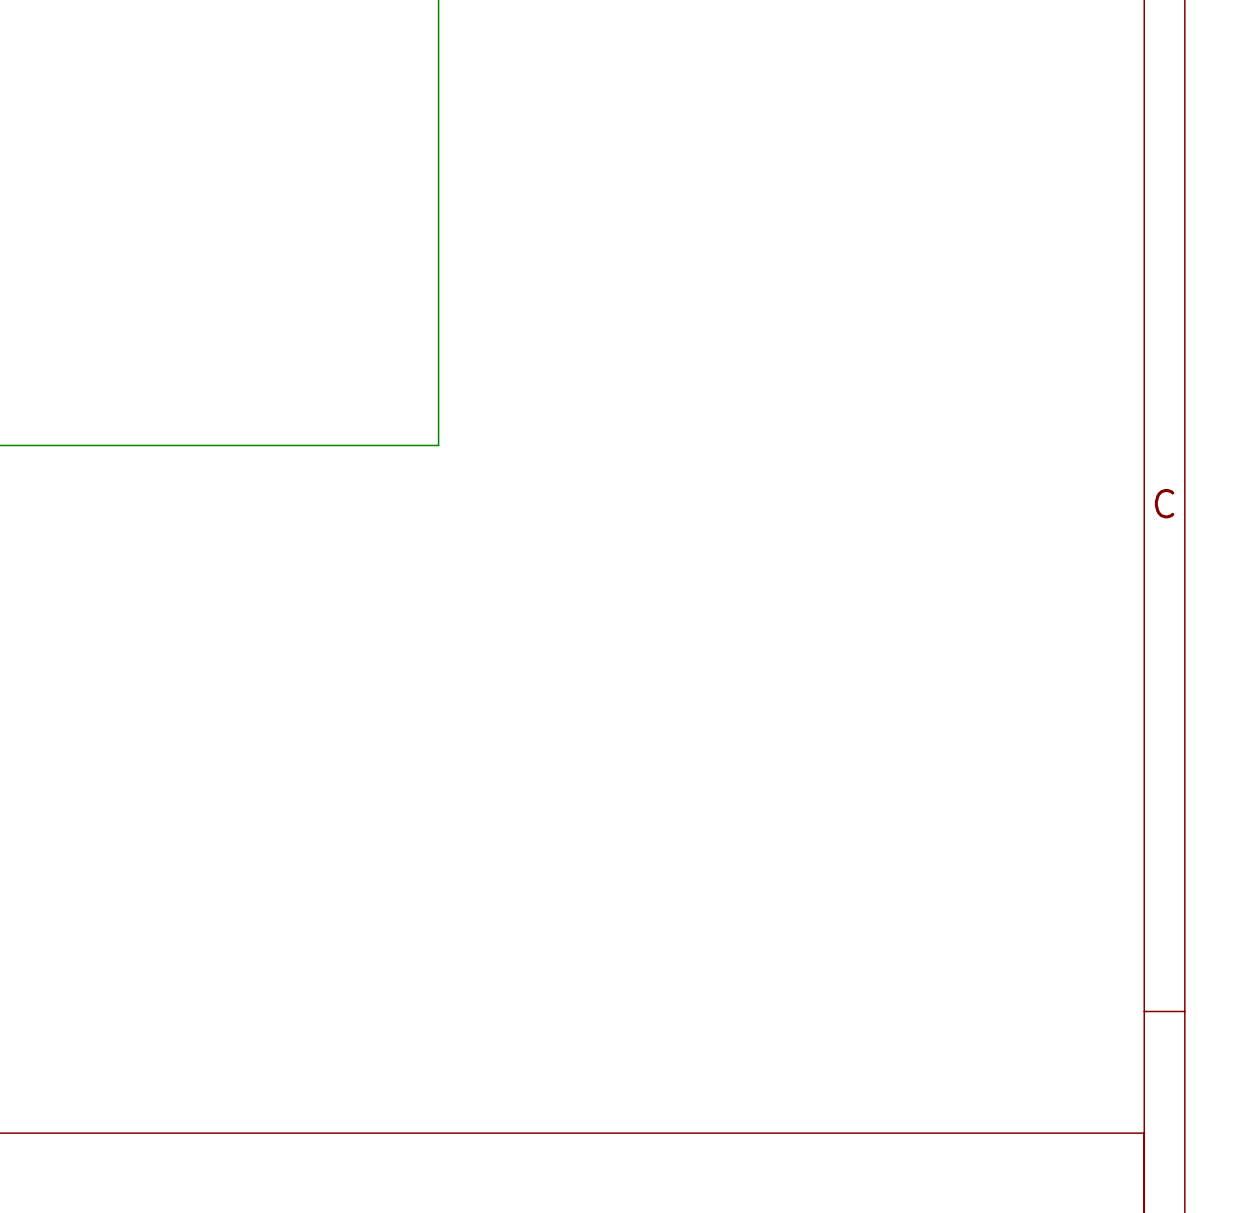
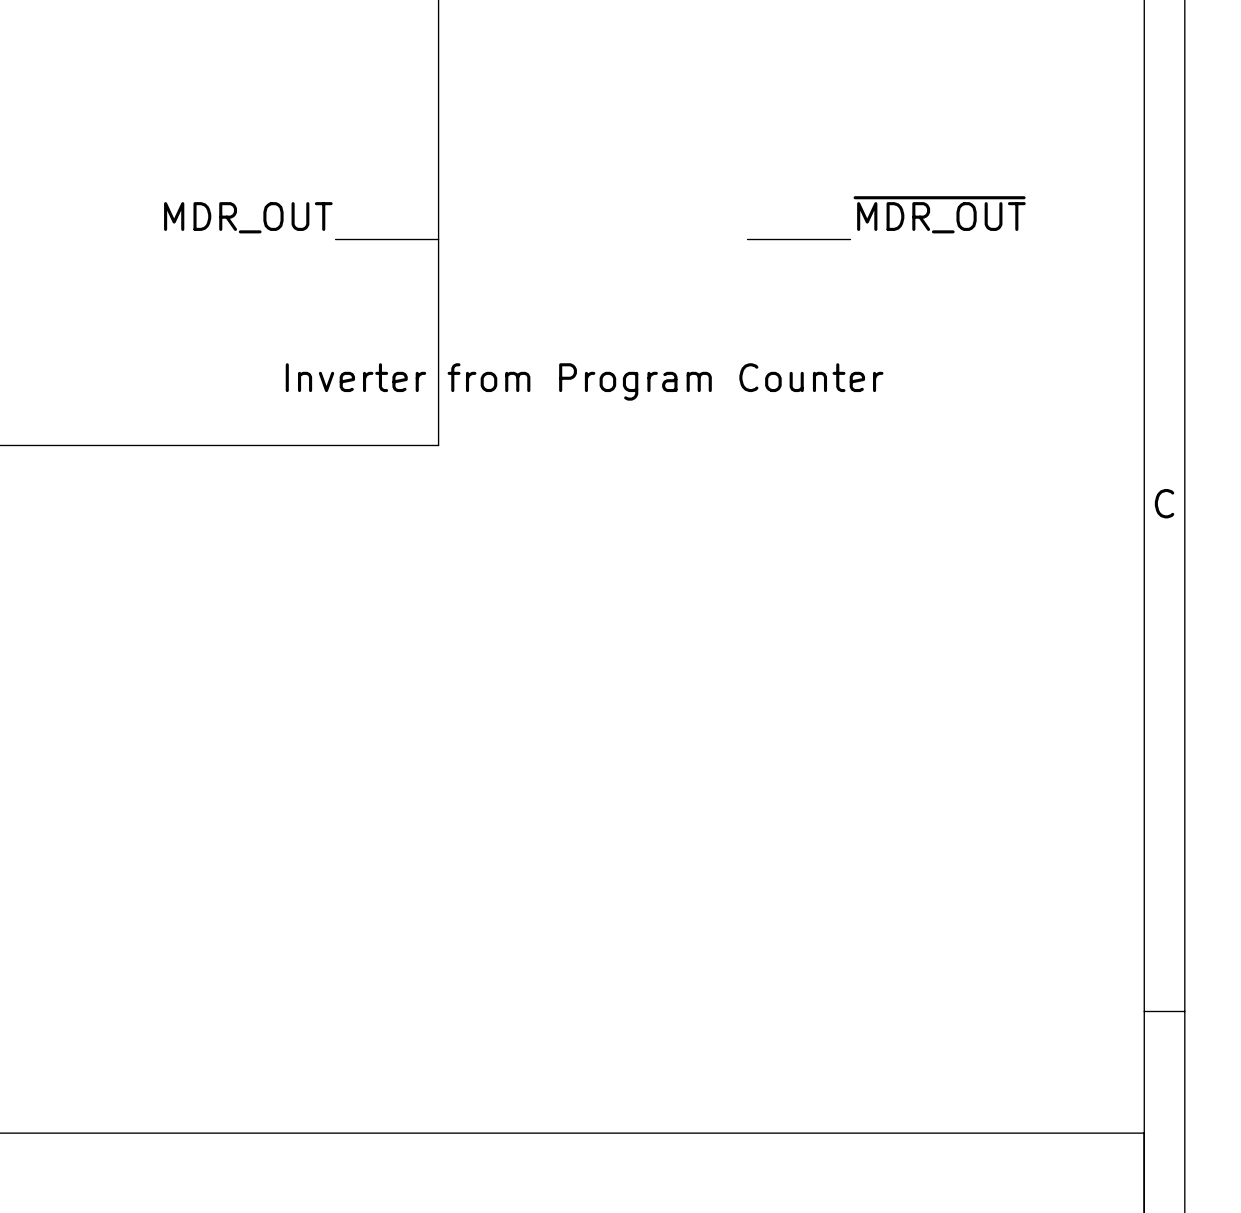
label: none -> ~{MDR_OUT} (939, 214)
label: none -> MDR_OUT (248, 217)
wire: none -> (335, 239) (438, 239)
wire: none -> (747, 239) (850, 239)
text: none -> Inverter from Program Counter (584, 381)

